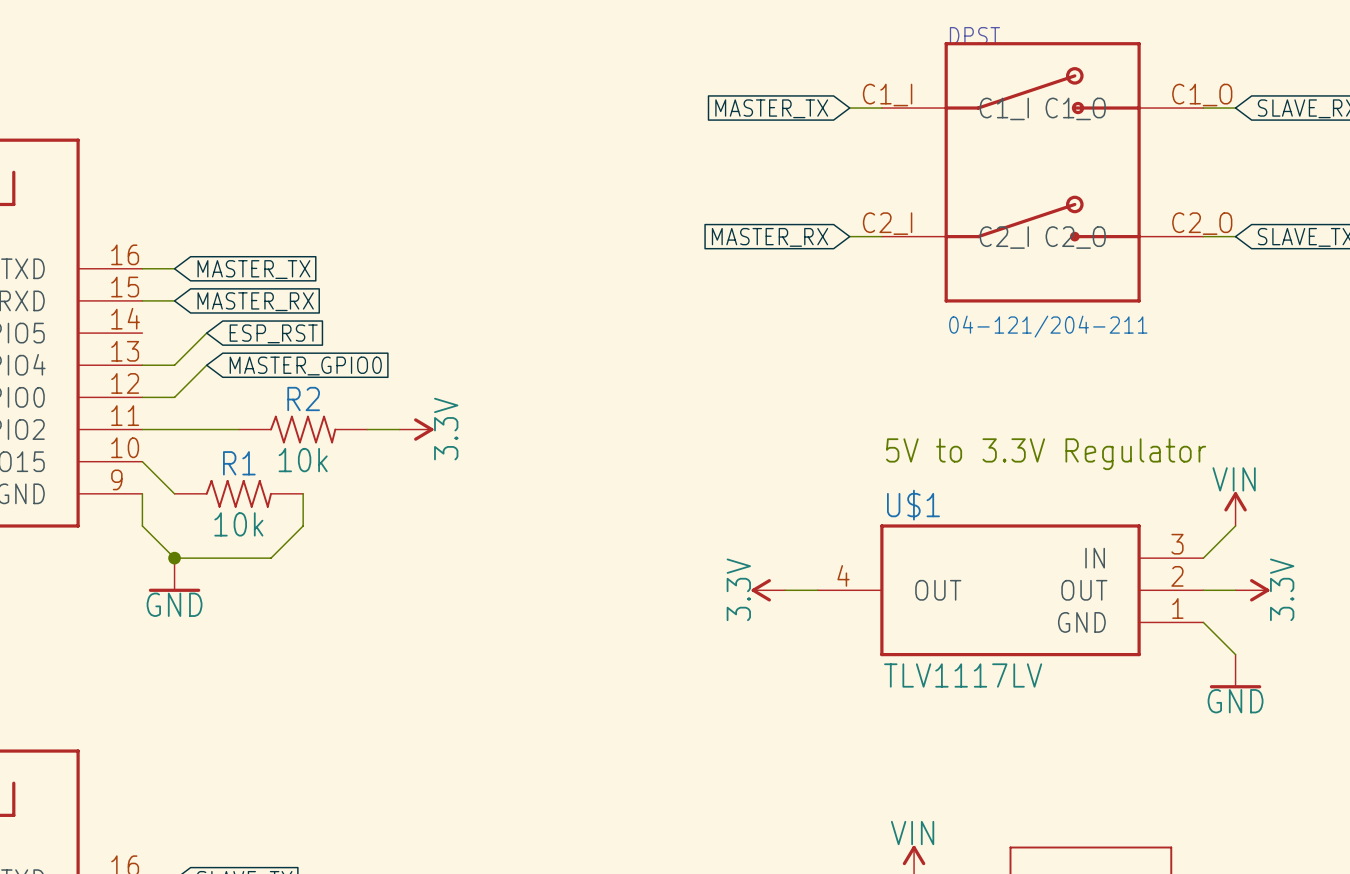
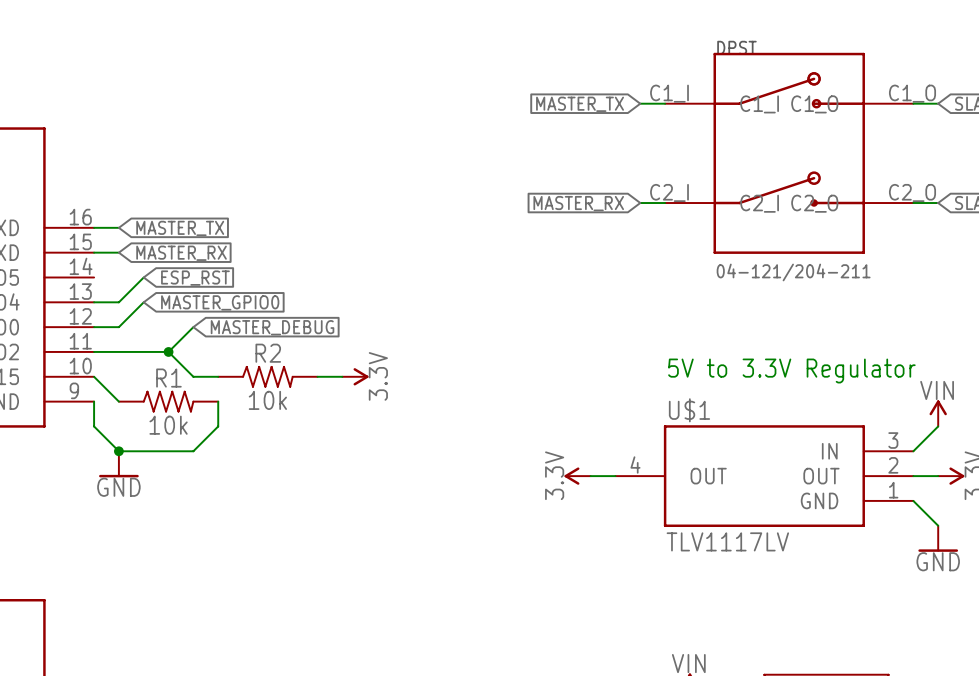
wire: none -> (193, 327) (168, 351) (193, 376) (218, 376)
global label: none -> MASTER_DEBUG (272, 327)
junction: none -> (168, 351)
R2 position: (303, 429) -> (267, 376)
wire: (367, 429) (399, 429) -> (317, 376) (342, 376)
power symbol position: 3.3V (416, 429) -> 3.3V (355, 376)

